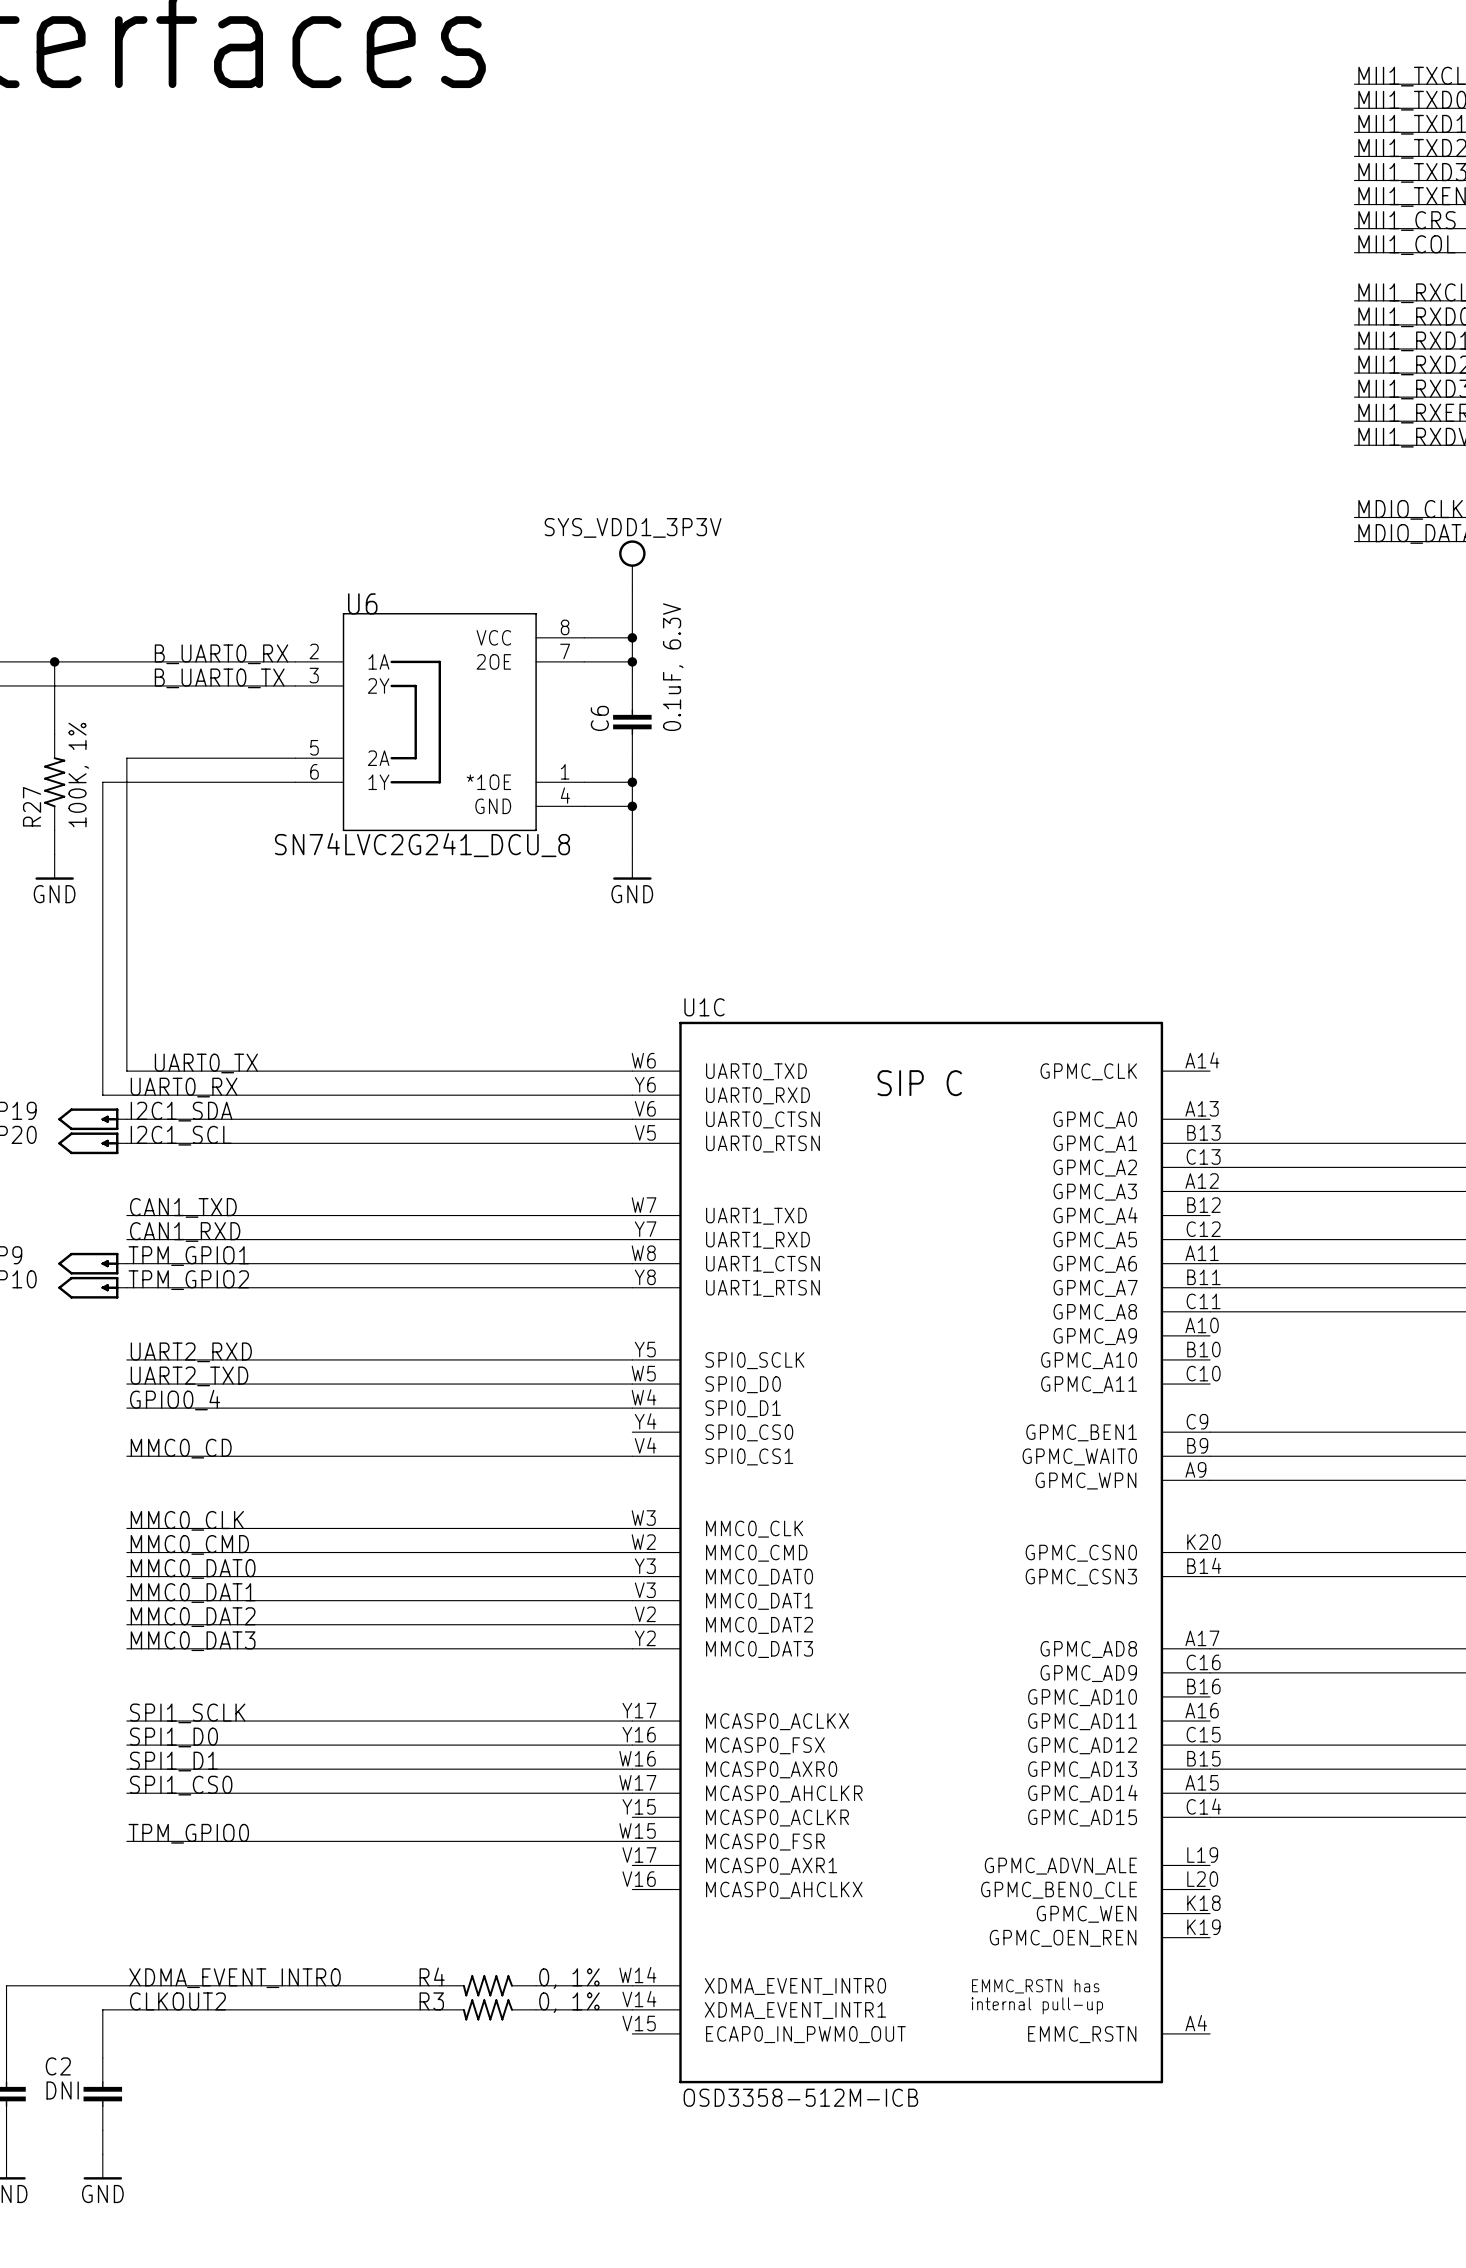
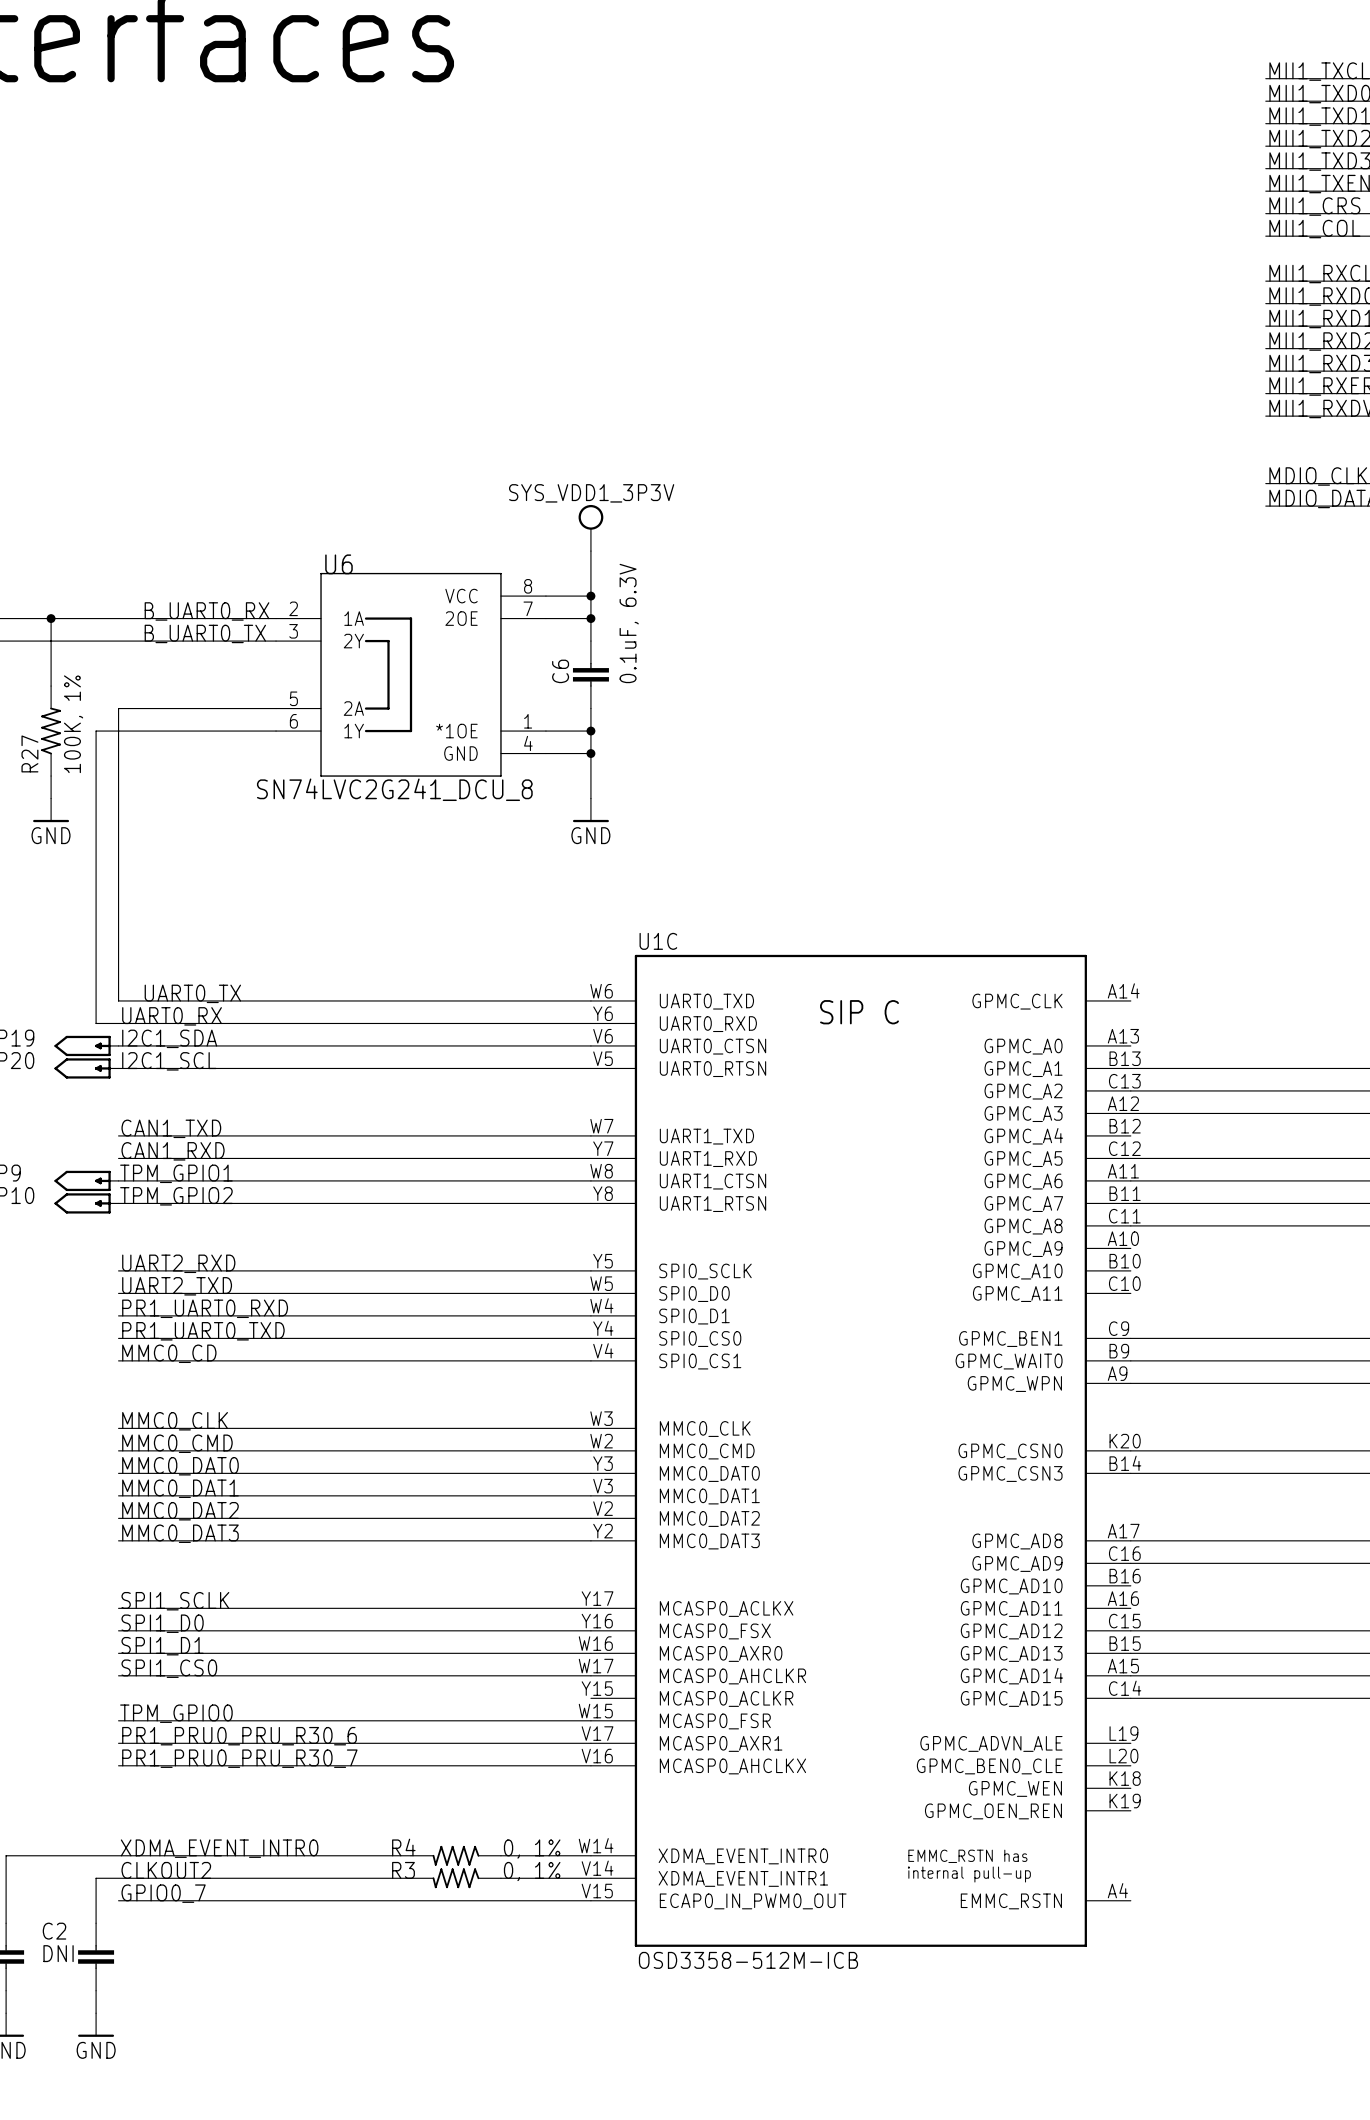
label: GPIO0_4 (175, 1400) -> PR1_UART0_RXD (205, 1308)
label: none -> PR1_UART0_TXD (203, 1331)
wire: none -> (118, 1338) (590, 1338)
label: none -> PR1_PRU0_PRU_R30_6 (239, 1736)
wire: none -> (118, 1743) (590, 1743)
label: none -> PR1_PRU0_PRU_R30_7 (239, 1758)
wire: none -> (118, 1765) (590, 1765)
label: none -> GPIO0_7 (163, 1893)
wire: none -> (118, 1900) (590, 1900)

